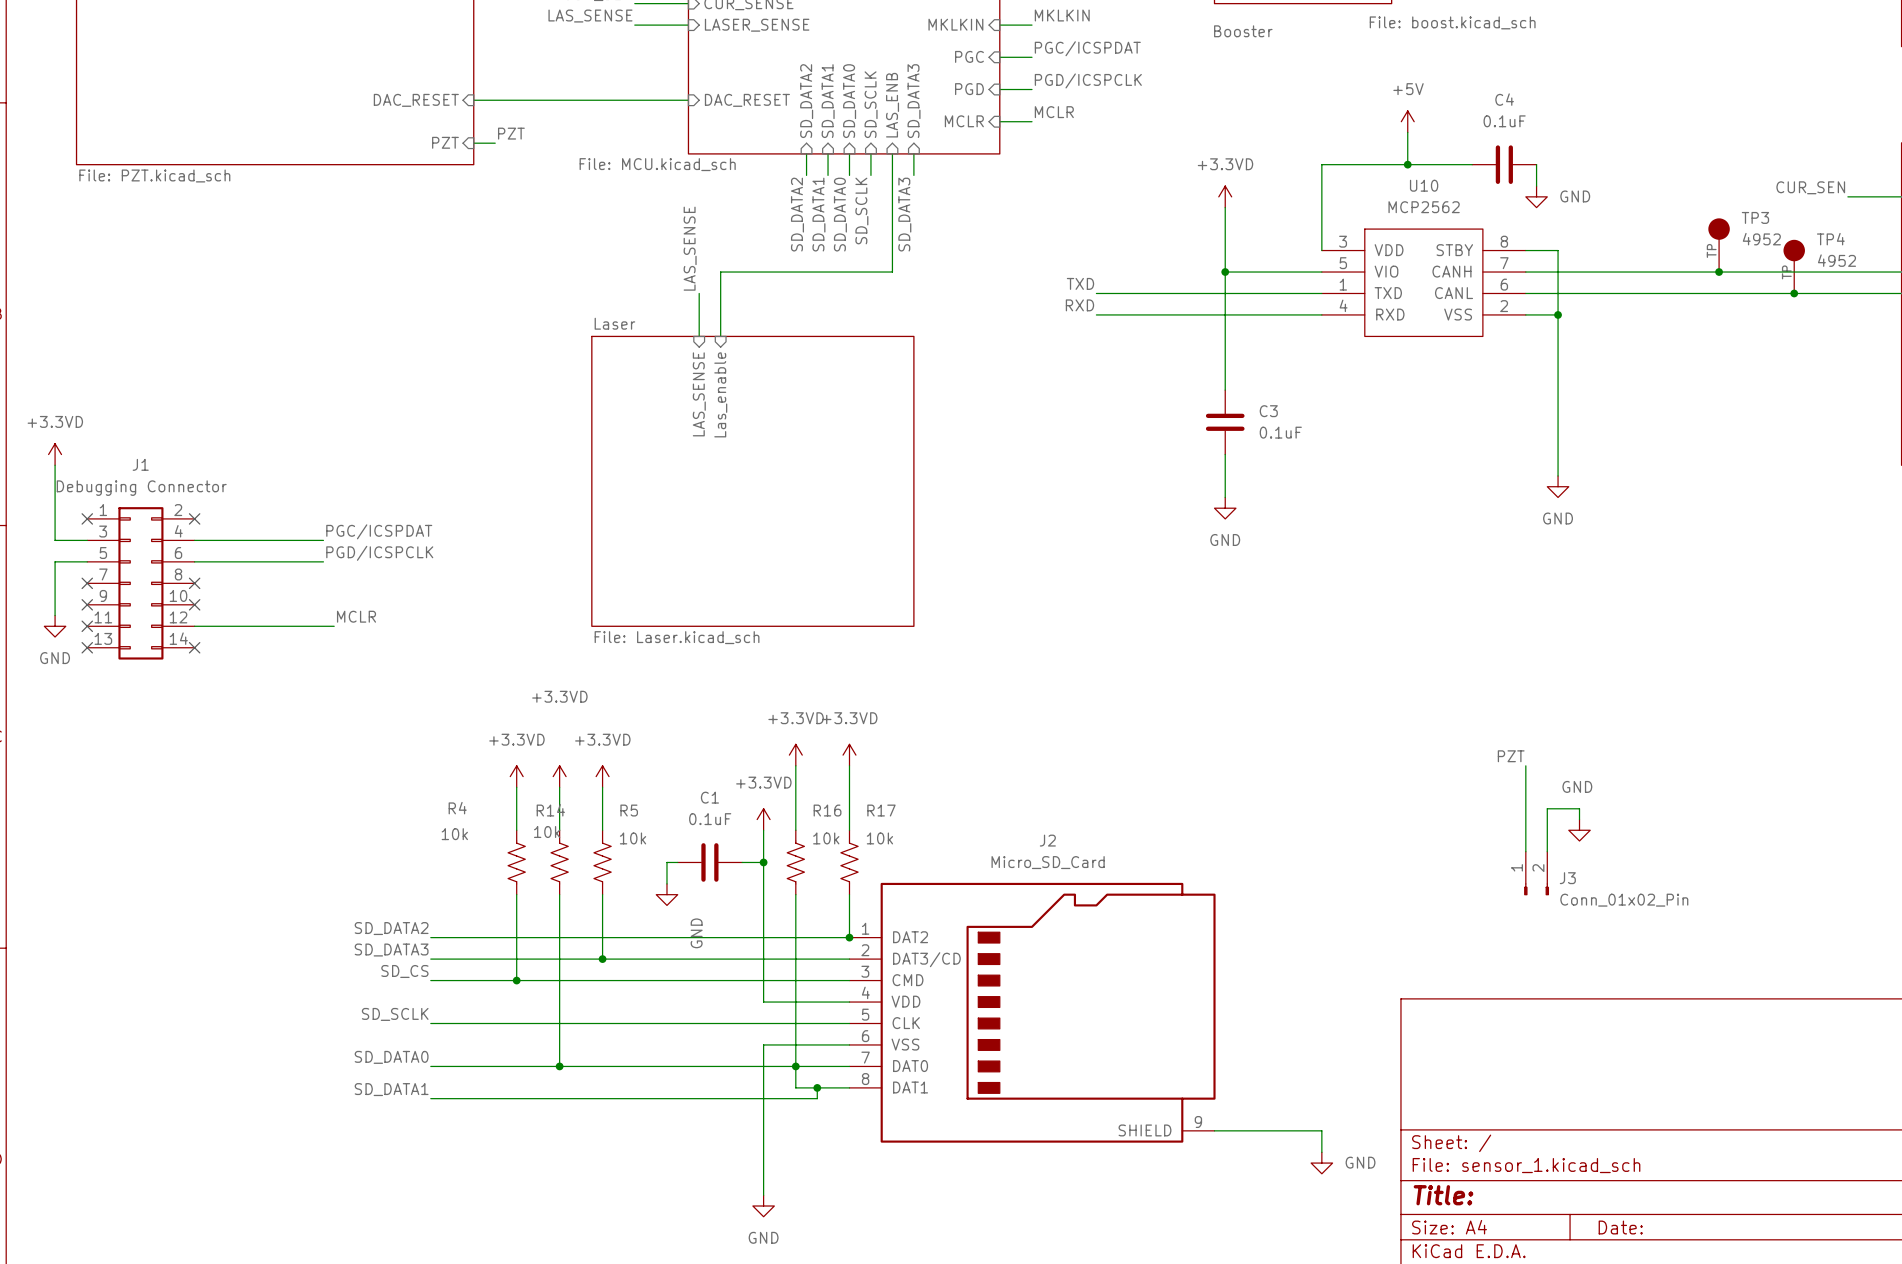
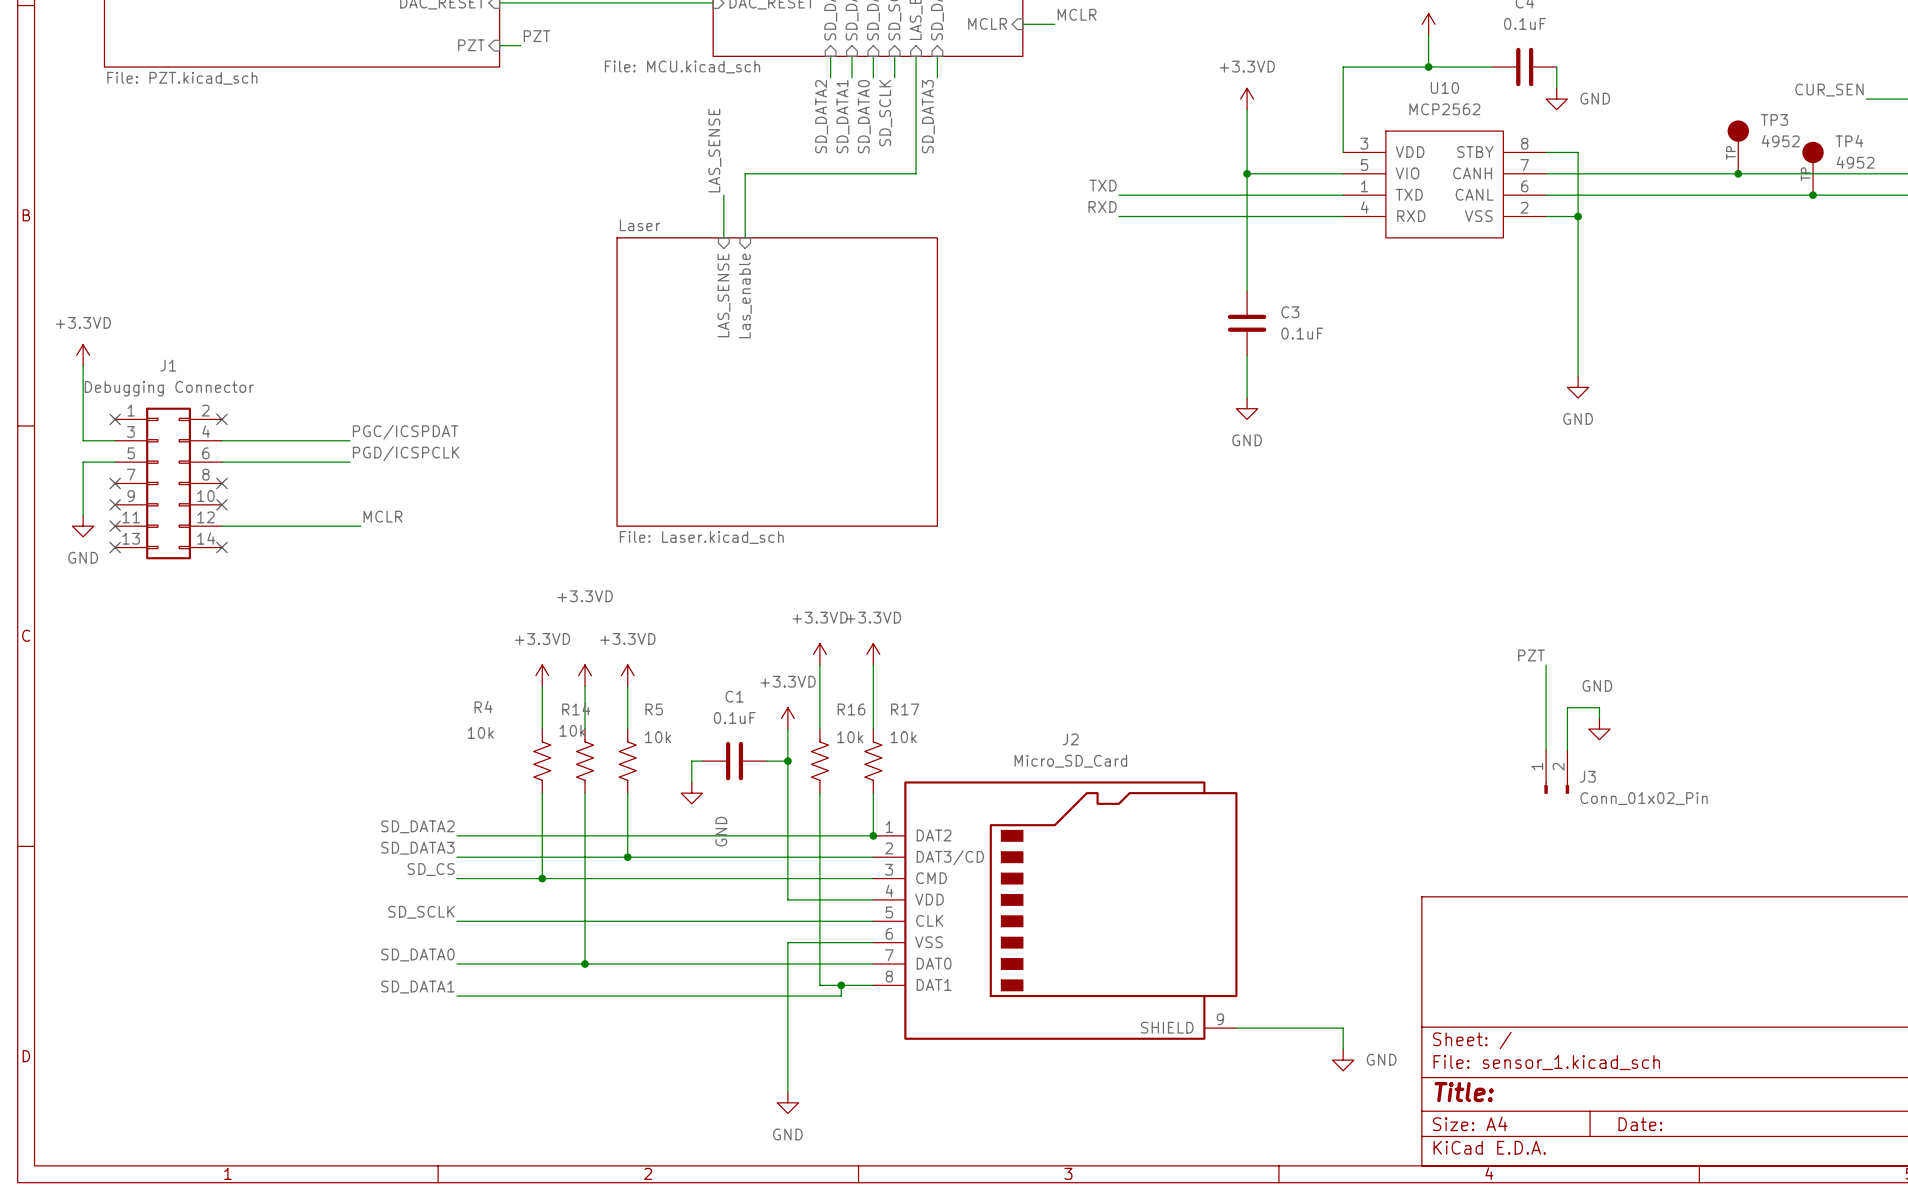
junction: (795, 1066) -> none

